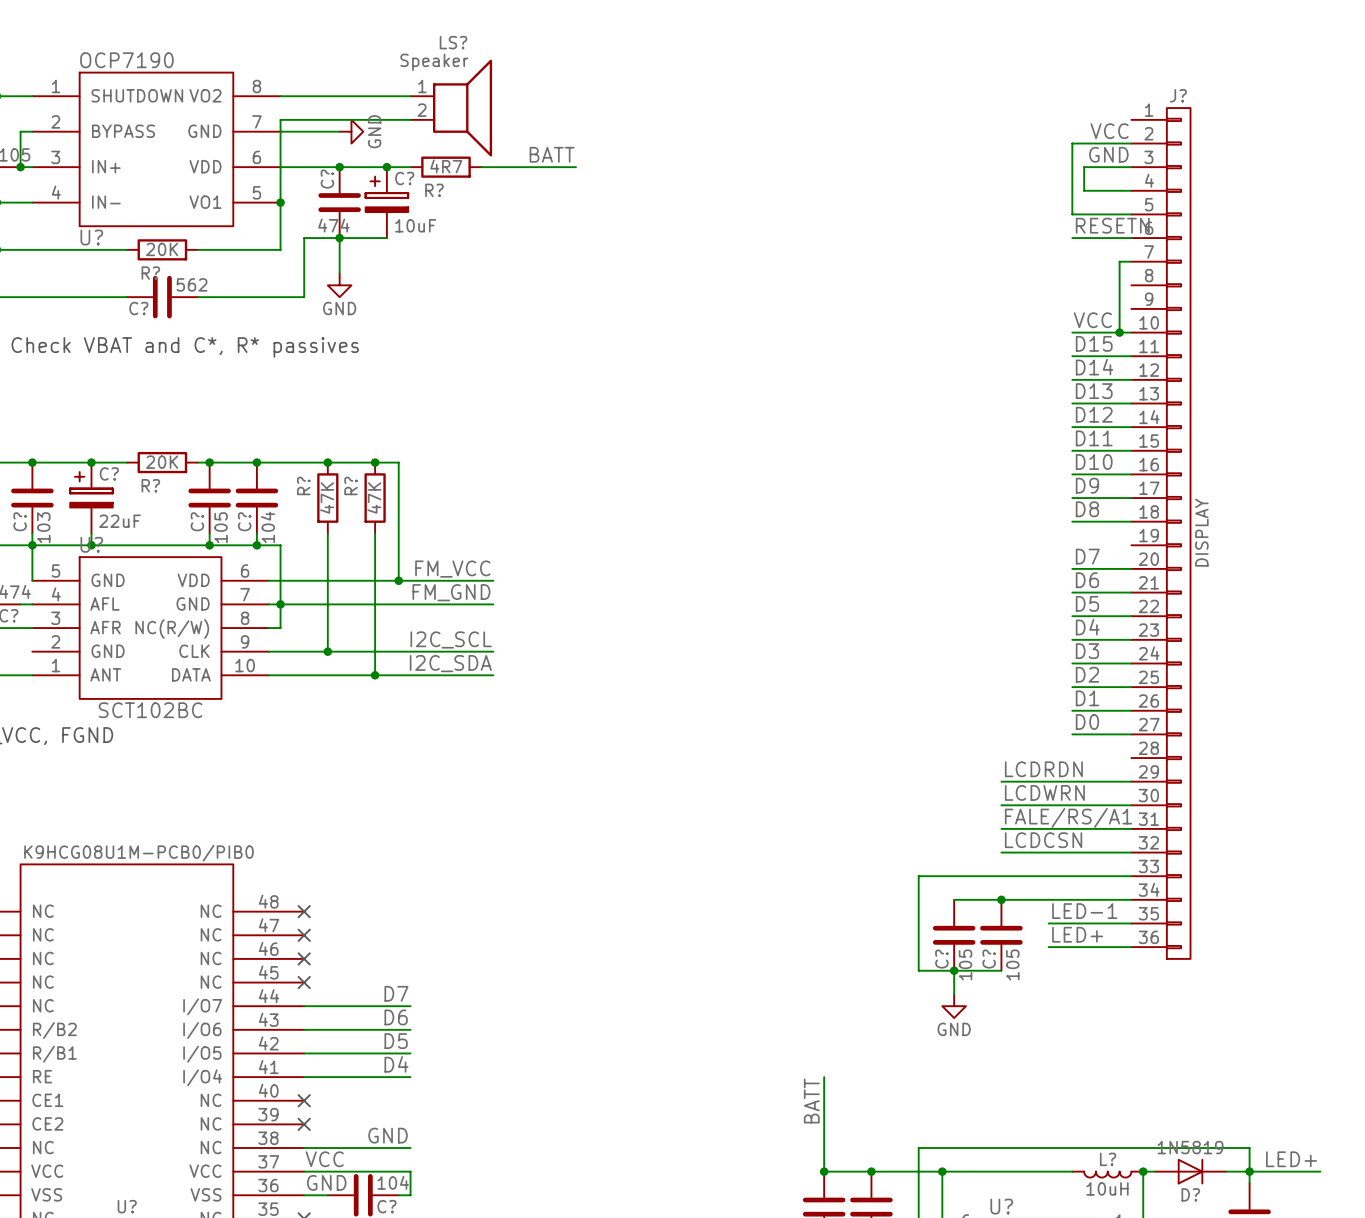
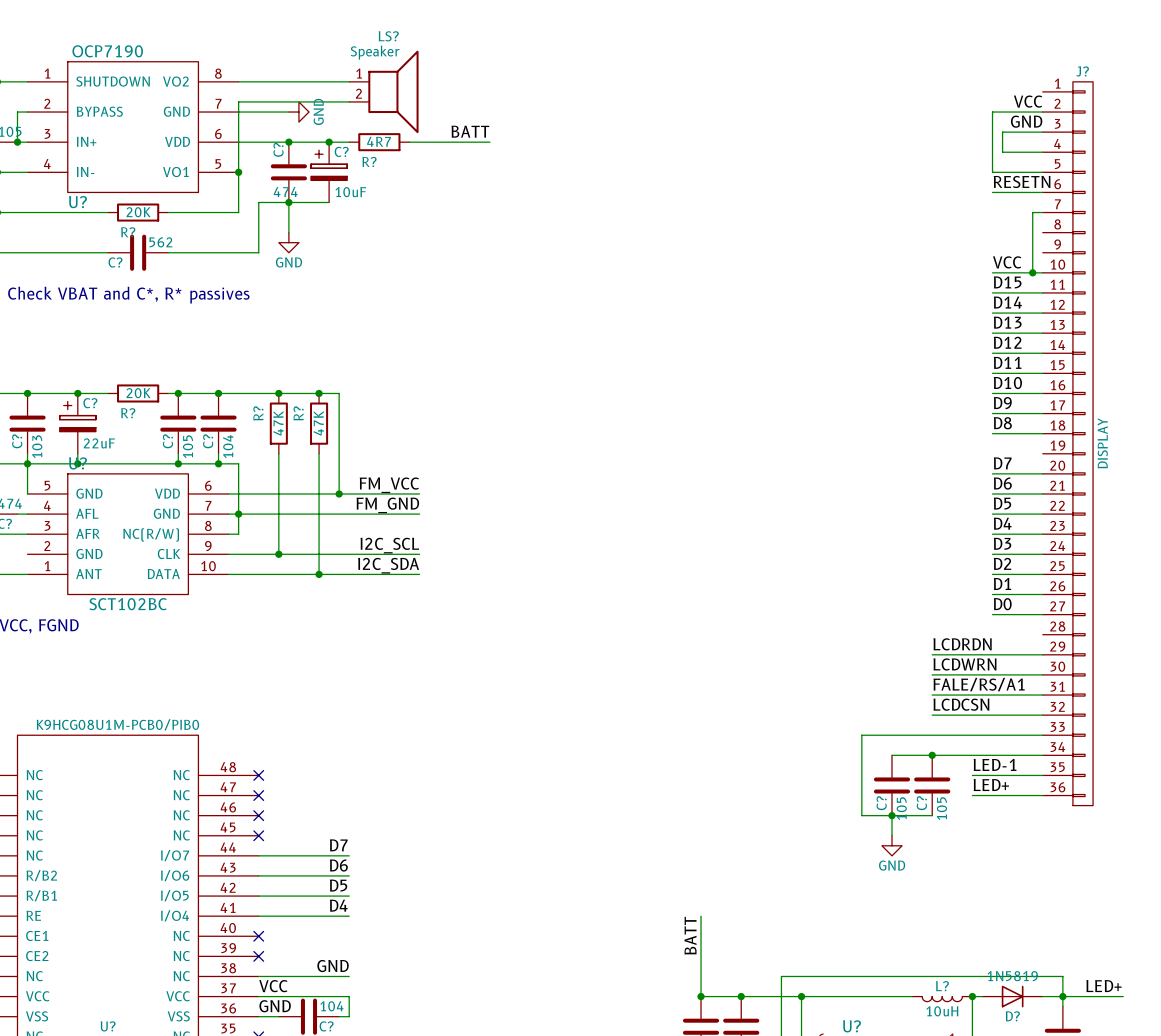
label: none -> VCC (1028, 101)
label: VCC (1109, 131) -> none
wire: (1131, 143) (1072, 143) (1072, 214) (1131, 214) -> (1042, 112) (992, 112) (992, 172) (1042, 172)
label position: GND (1108, 154) -> GND (1026, 121)
wire: (1131, 167) (1084, 167) (1084, 190) (1131, 190) -> (1042, 132) (1002, 132) (1002, 152) (1042, 152)
label position: RESETN (1112, 225) -> RESETN (1022, 181)
wire: (1072, 238) (1131, 238) -> (992, 192) (1042, 192)
wire: (1131, 261) (1119, 261) (1119, 332) -> (1042, 212) (1032, 212) (1032, 272)
label: none -> VCC (1007, 262)
label: VCC (1092, 320) -> none
junction: none -> (1032, 272)
wire: (1072, 332) (1131, 332) -> (992, 272) (1042, 272)
junction: (1119, 332) -> none
label position: D15 (1094, 343) -> D15 (1007, 282)
wire: (1072, 356) (1131, 356) -> (992, 292) (1042, 292)
label position: D14 (1094, 367) -> D14 (1007, 302)
wire: (1072, 379) (1131, 379) -> (992, 313) (1042, 313)
label position: D13 (1094, 391) -> D13 (1007, 322)
wire: (1072, 403) (1131, 403) -> (992, 333) (1042, 333)
label position: D12 (1094, 414) -> D12 (1007, 342)
wire: (1072, 427) (1131, 427) -> (992, 353) (1042, 353)
label position: D11 (1094, 438) -> D11 (1007, 362)
wire: (1072, 450) (1131, 450) -> (992, 373) (1042, 373)
label position: D10 (1094, 462) -> D10 (1007, 383)
wire: (1072, 474) (1131, 474) -> (992, 393) (1042, 393)
label position: D9 (1087, 485) -> D9 (1002, 403)
wire: (1072, 498) (1131, 498) -> (992, 413) (1042, 413)
label position: D8 (1087, 509) -> D8 (1002, 423)
wire: (1072, 521) (1131, 521) -> (992, 433) (1042, 433)
J? position: (1160, 533) -> (1067, 443)
label position: D7 (1087, 556) -> D7 (1002, 463)
wire: (1072, 568) (1131, 568) -> (992, 473) (1042, 473)
label position: D6 (1087, 580) -> D6 (1002, 483)
wire: (1072, 592) (1131, 592) -> (992, 493) (1042, 493)
label position: D5 (1087, 603) -> D5 (1002, 503)
wire: (1072, 616) (1131, 616) -> (992, 514) (1042, 514)
label position: D4 (1087, 627) -> D4 (1002, 523)
wire: (1072, 639) (1131, 639) -> (992, 534) (1042, 534)
label position: D3 (1087, 651) -> D3 (1002, 543)
wire: (1072, 663) (1131, 663) -> (992, 554) (1042, 554)
label position: D2 (1087, 674) -> D2 (1002, 563)
wire: (1072, 687) (1131, 687) -> (992, 574) (1042, 574)
label position: D1 (1087, 698) -> D1 (1002, 583)
wire: (1072, 710) (1131, 710) -> (992, 594) (1042, 594)
label position: D0 (1087, 722) -> D0 (1002, 604)
wire: (1072, 734) (1131, 734) -> (992, 614) (1042, 614)
label position: LCDRDN (1043, 769) -> LCDRDN (962, 644)
wire: (1001, 781) (1131, 781) -> (932, 654) (1042, 654)
label position: LCDWRN (1044, 792) -> LCDWRN (964, 664)
wire: (1001, 805) (1131, 805) -> (932, 674) (1042, 674)
label position: FALE/RS/A1 (1068, 817) -> FALE/RS/A1 (979, 684)
wire: (1001, 828) (1131, 828) -> (932, 695) (1042, 695)
label position: LCDCSN (1043, 840) -> LCDCSN (961, 704)
wire: (1001, 852) (1131, 852) -> (932, 715) (1042, 715)
wire: (1131, 876) (918, 876) (918, 970) (1001, 970) -> (1042, 735) (861, 735) (861, 815) (932, 815)
junction: none -> (932, 755)
wire: (954, 899) (1131, 899) -> (892, 755) (1042, 755)
junction: (1001, 899) -> none
label position: LED-1 (1084, 911) -> LED-1 (995, 764)
wire: (1048, 923) (1131, 923) -> (972, 775) (1042, 775)
C?: none -> 105 (892, 785)
C?: none -> 105 (932, 785)
label position: LED+ (1077, 934) -> LED+ (991, 785)
C?: 105 (954, 935) -> none
C?: 105 (1001, 935) -> none
wire: (1048, 947) (1131, 947) -> (972, 795) (1042, 795)
junction: none -> (892, 815)
wire: (954, 970) (954, 994) -> (892, 815) (892, 835)
junction: (954, 970) -> none
power symbol position: GND (954, 1006) -> GND (892, 845)

